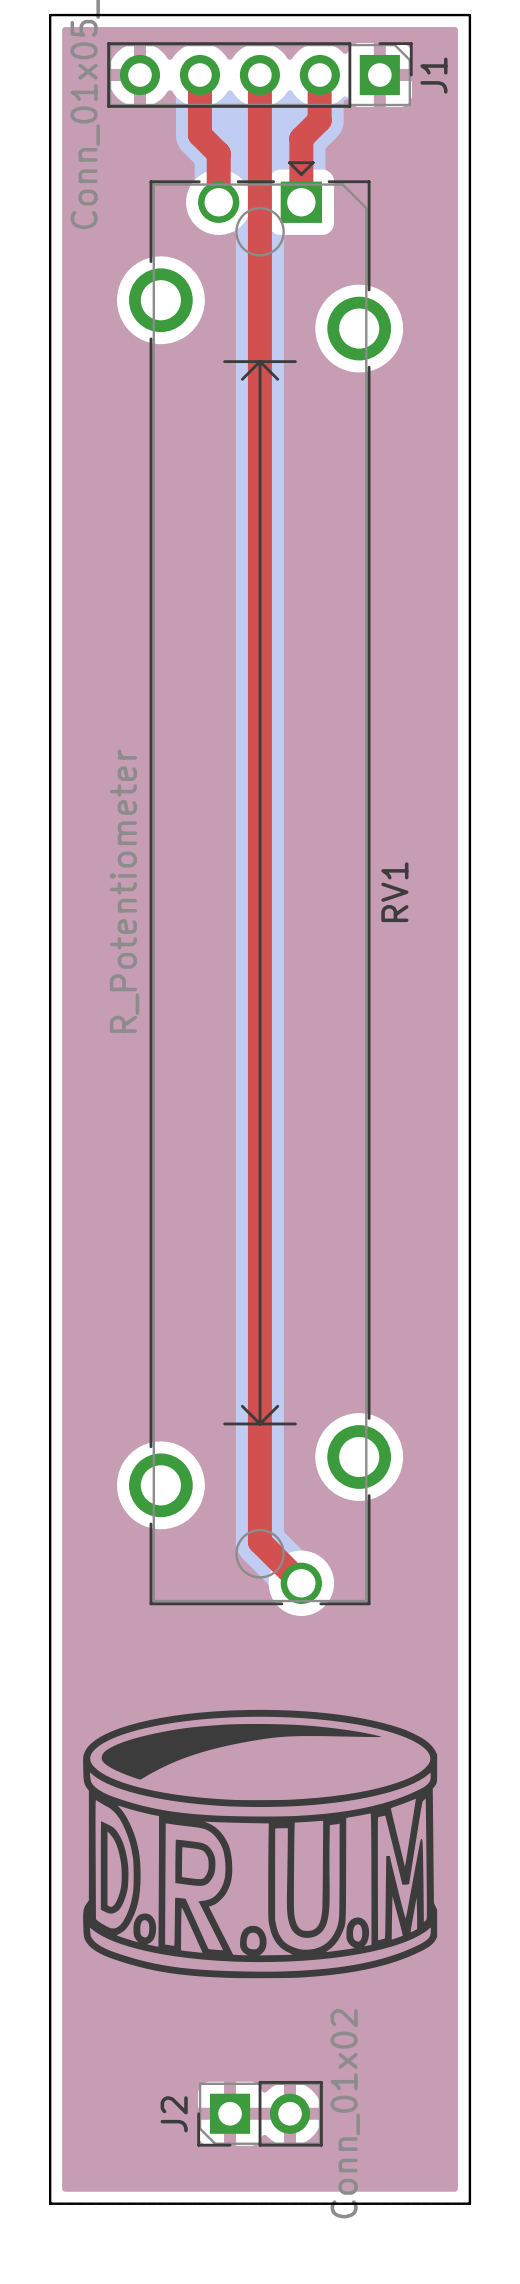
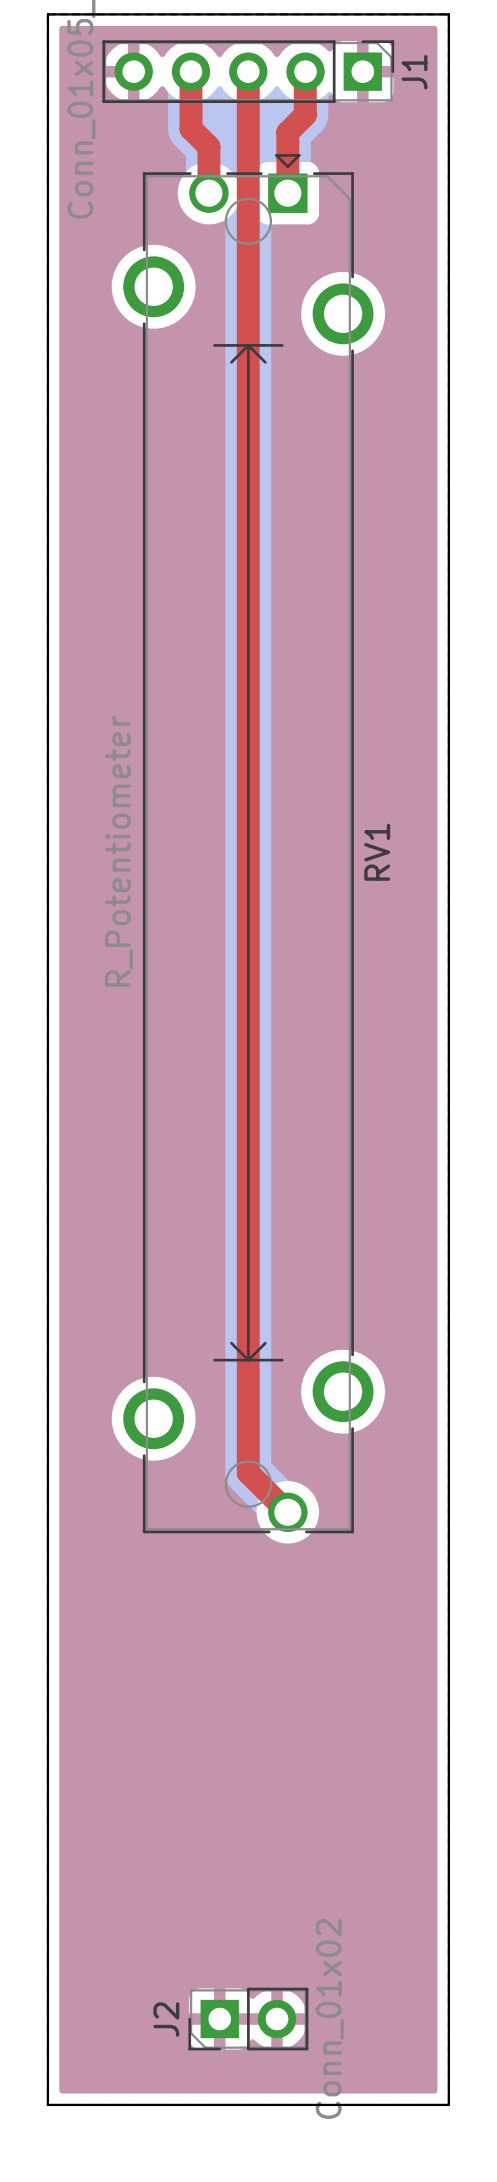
drawing: [83, 1709, 438, 1979] -> none

